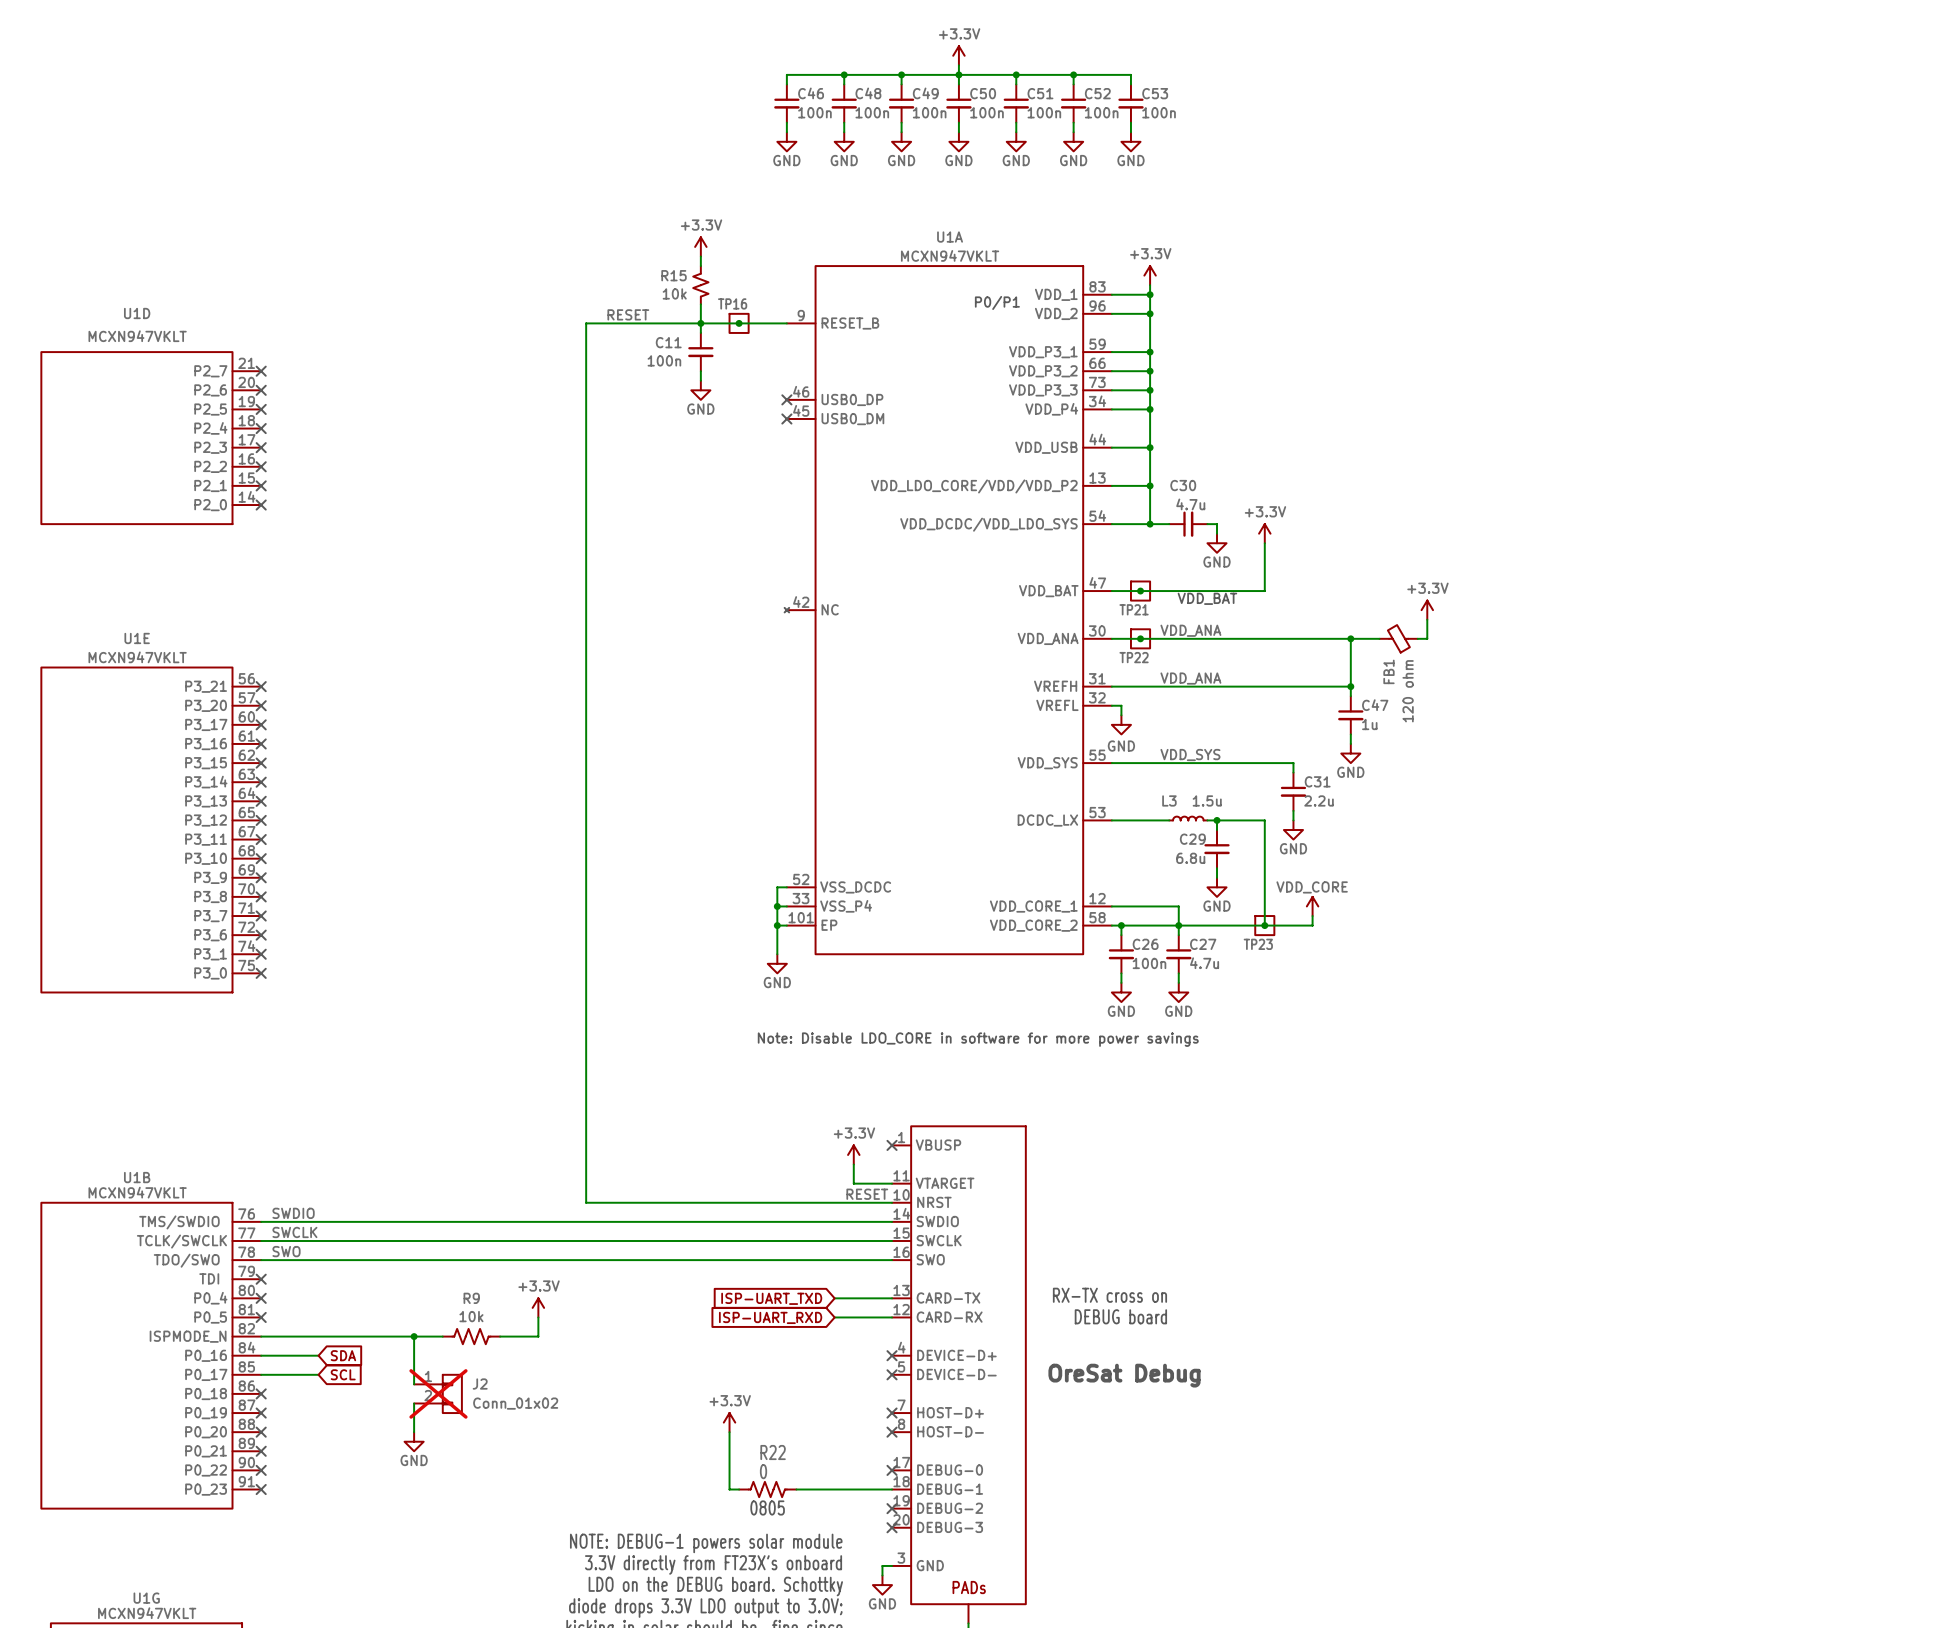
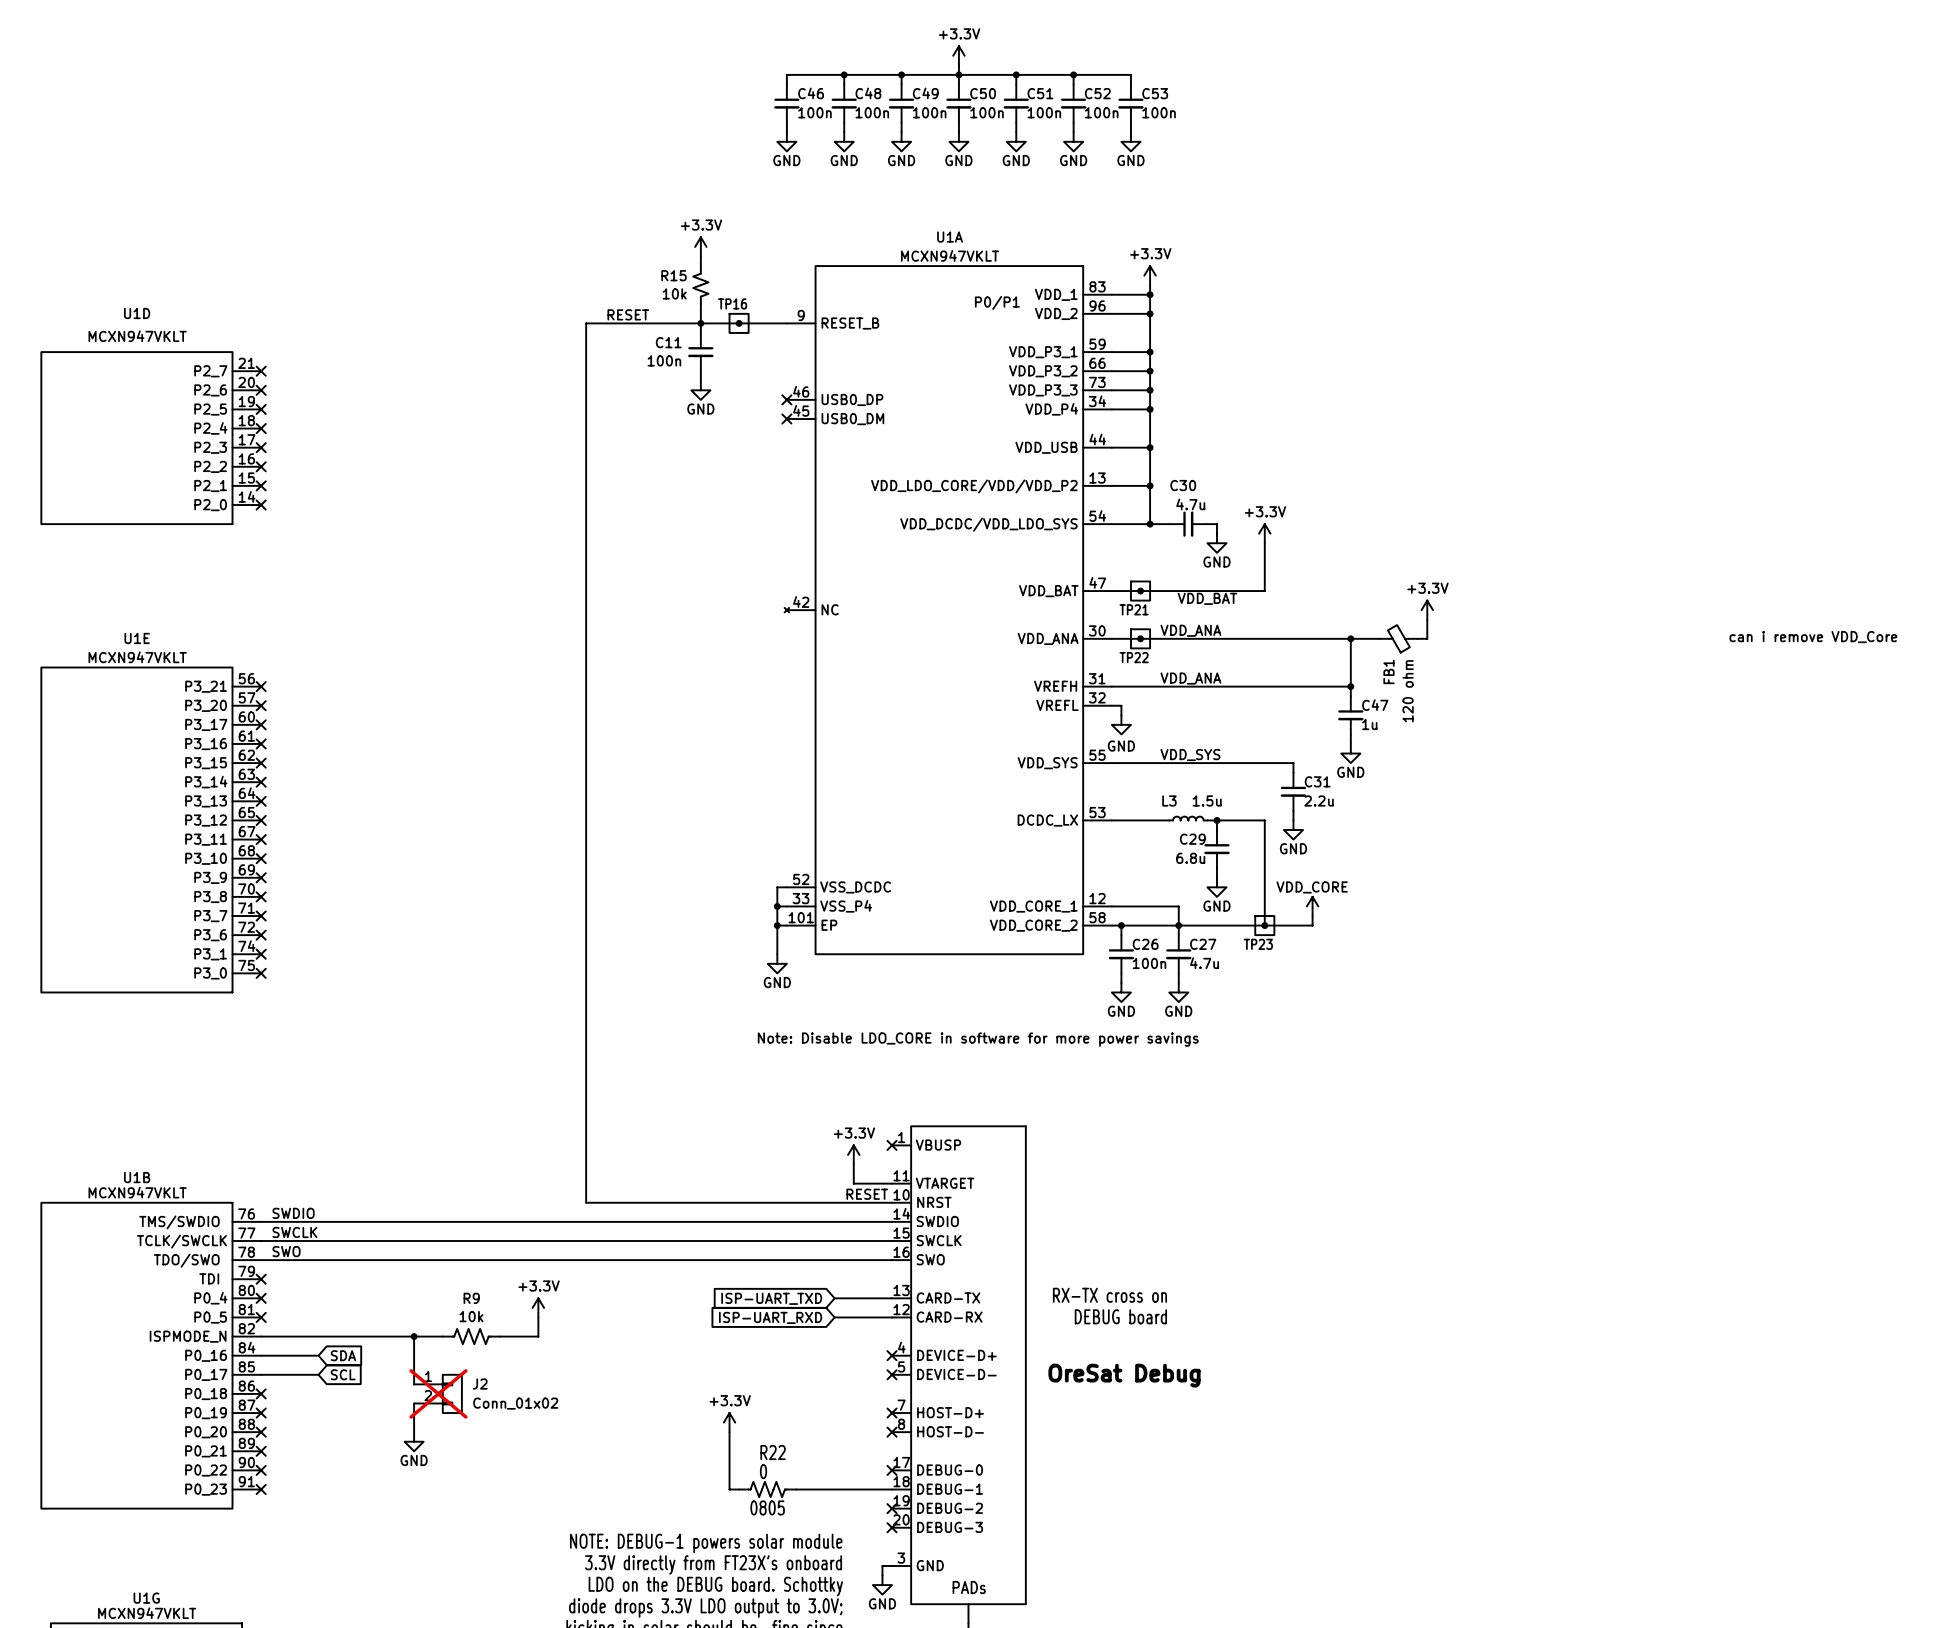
text: none -> can i remove VDD_Core (1813, 637)

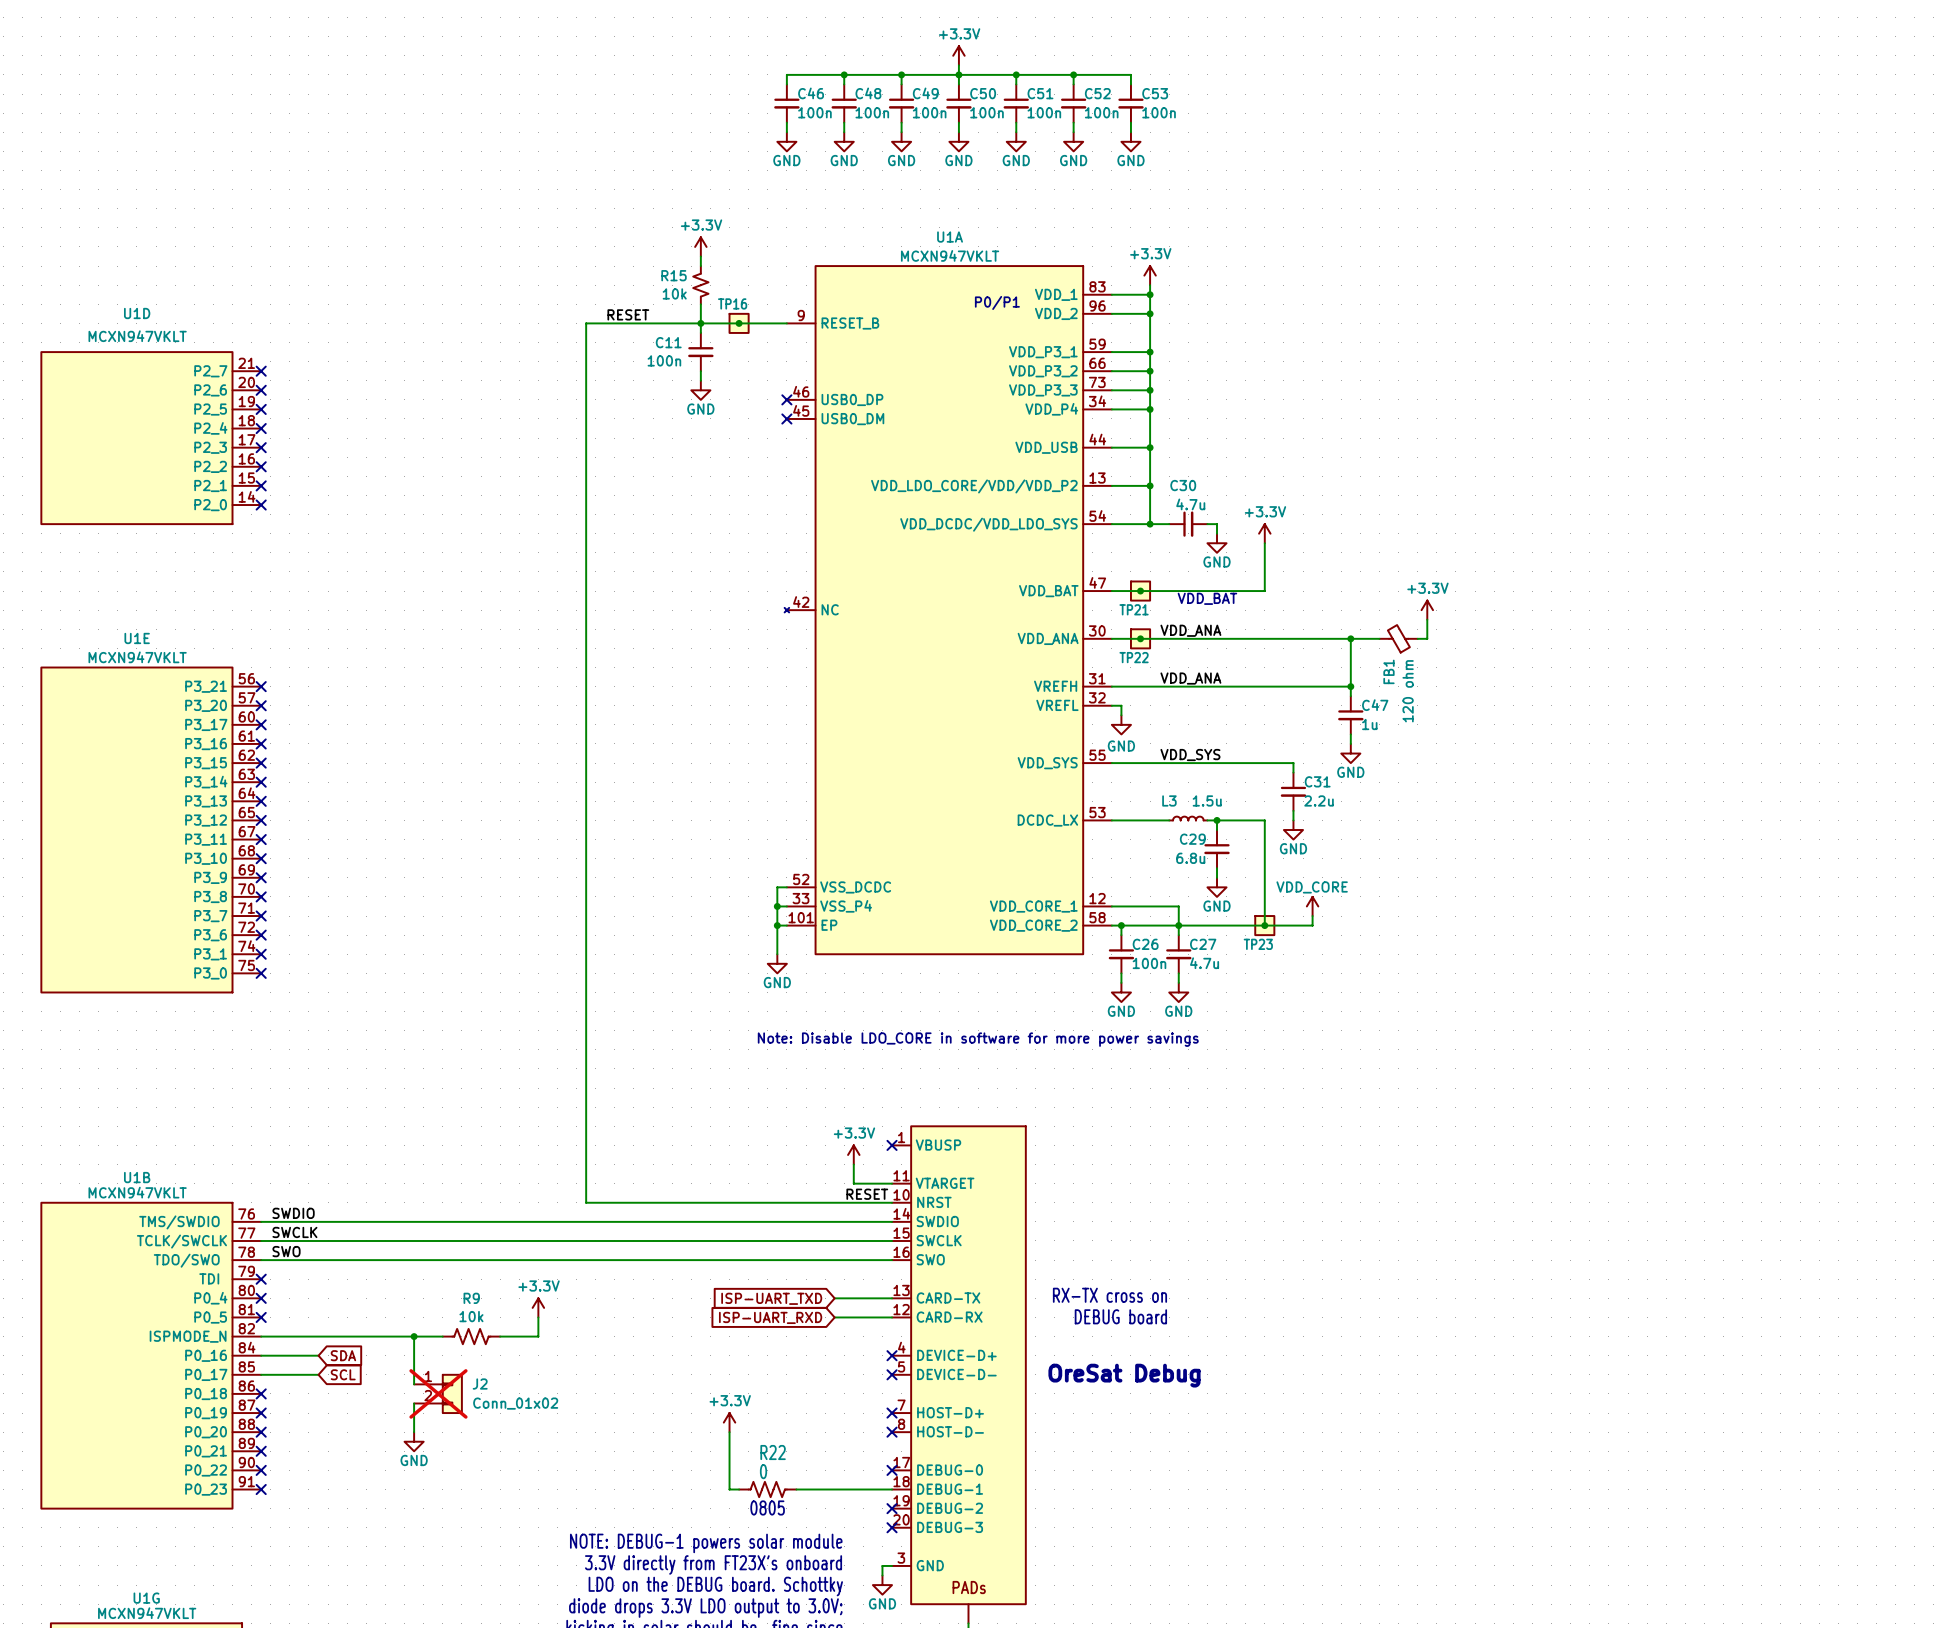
text: can i remove VDD_Core (1813, 637) -> none

